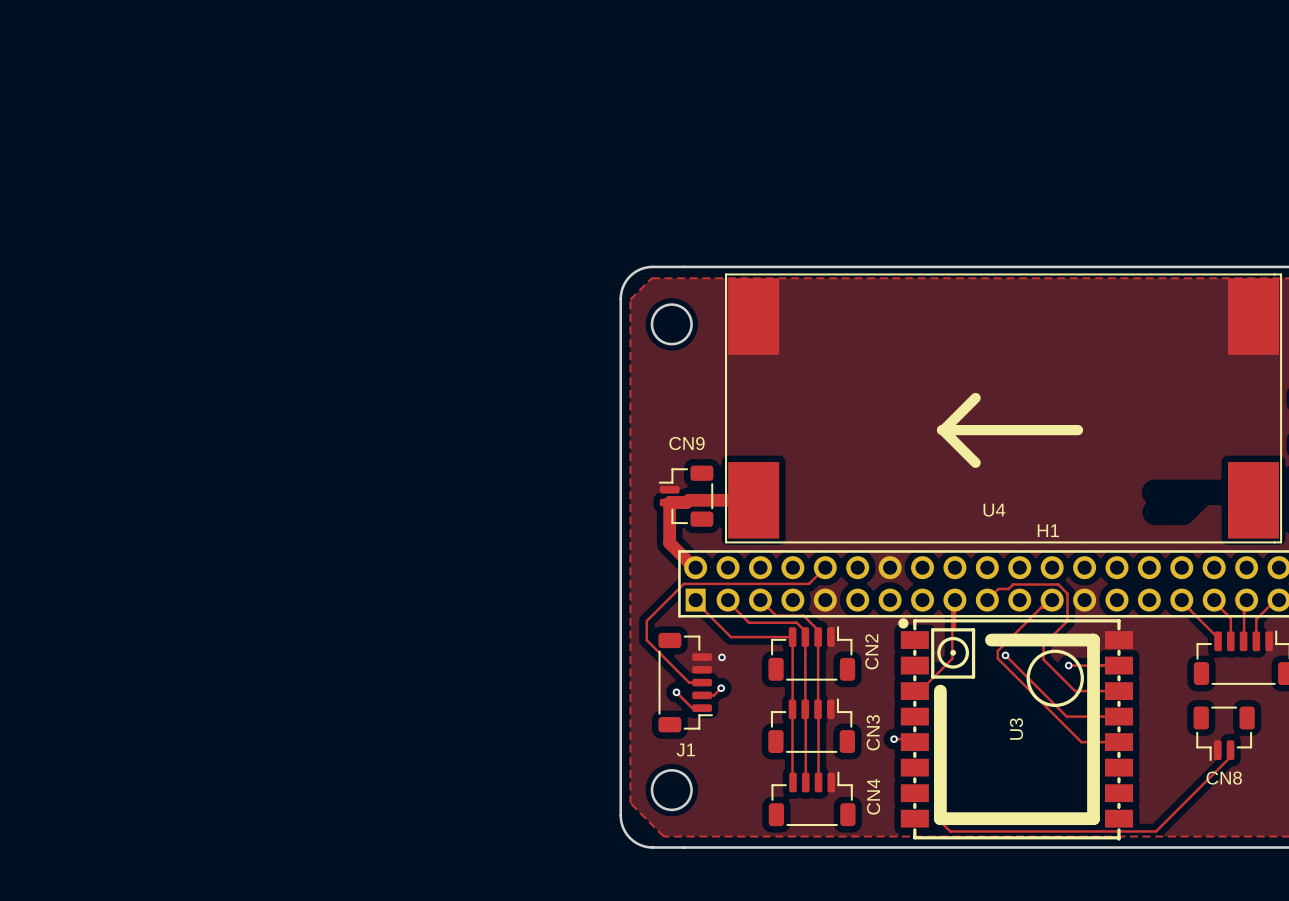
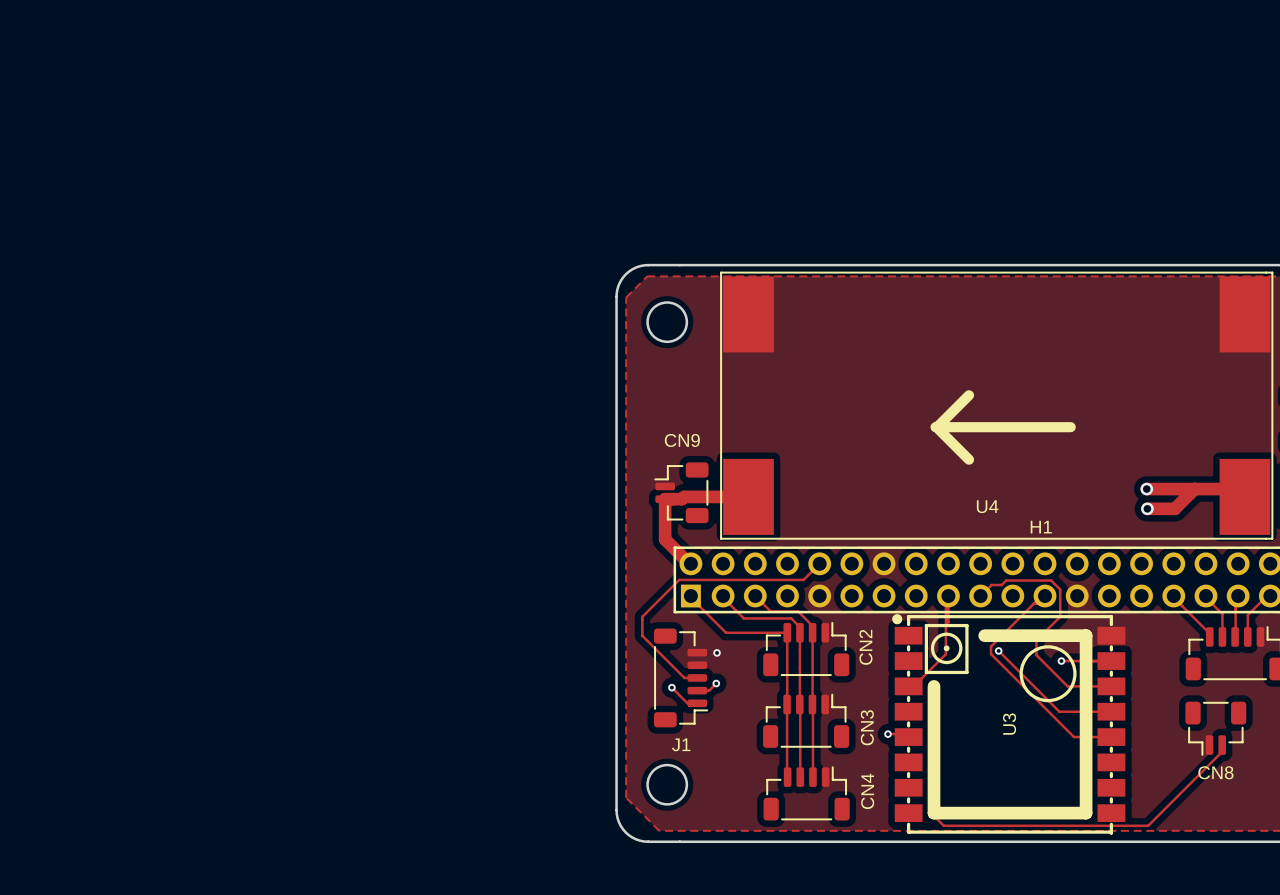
track: none -> (1146, 489) (1236, 489)
via: none -> (1146, 489)
track: none -> (1194, 489) (1174, 508) (1147, 508)
via: none -> (1147, 508)

